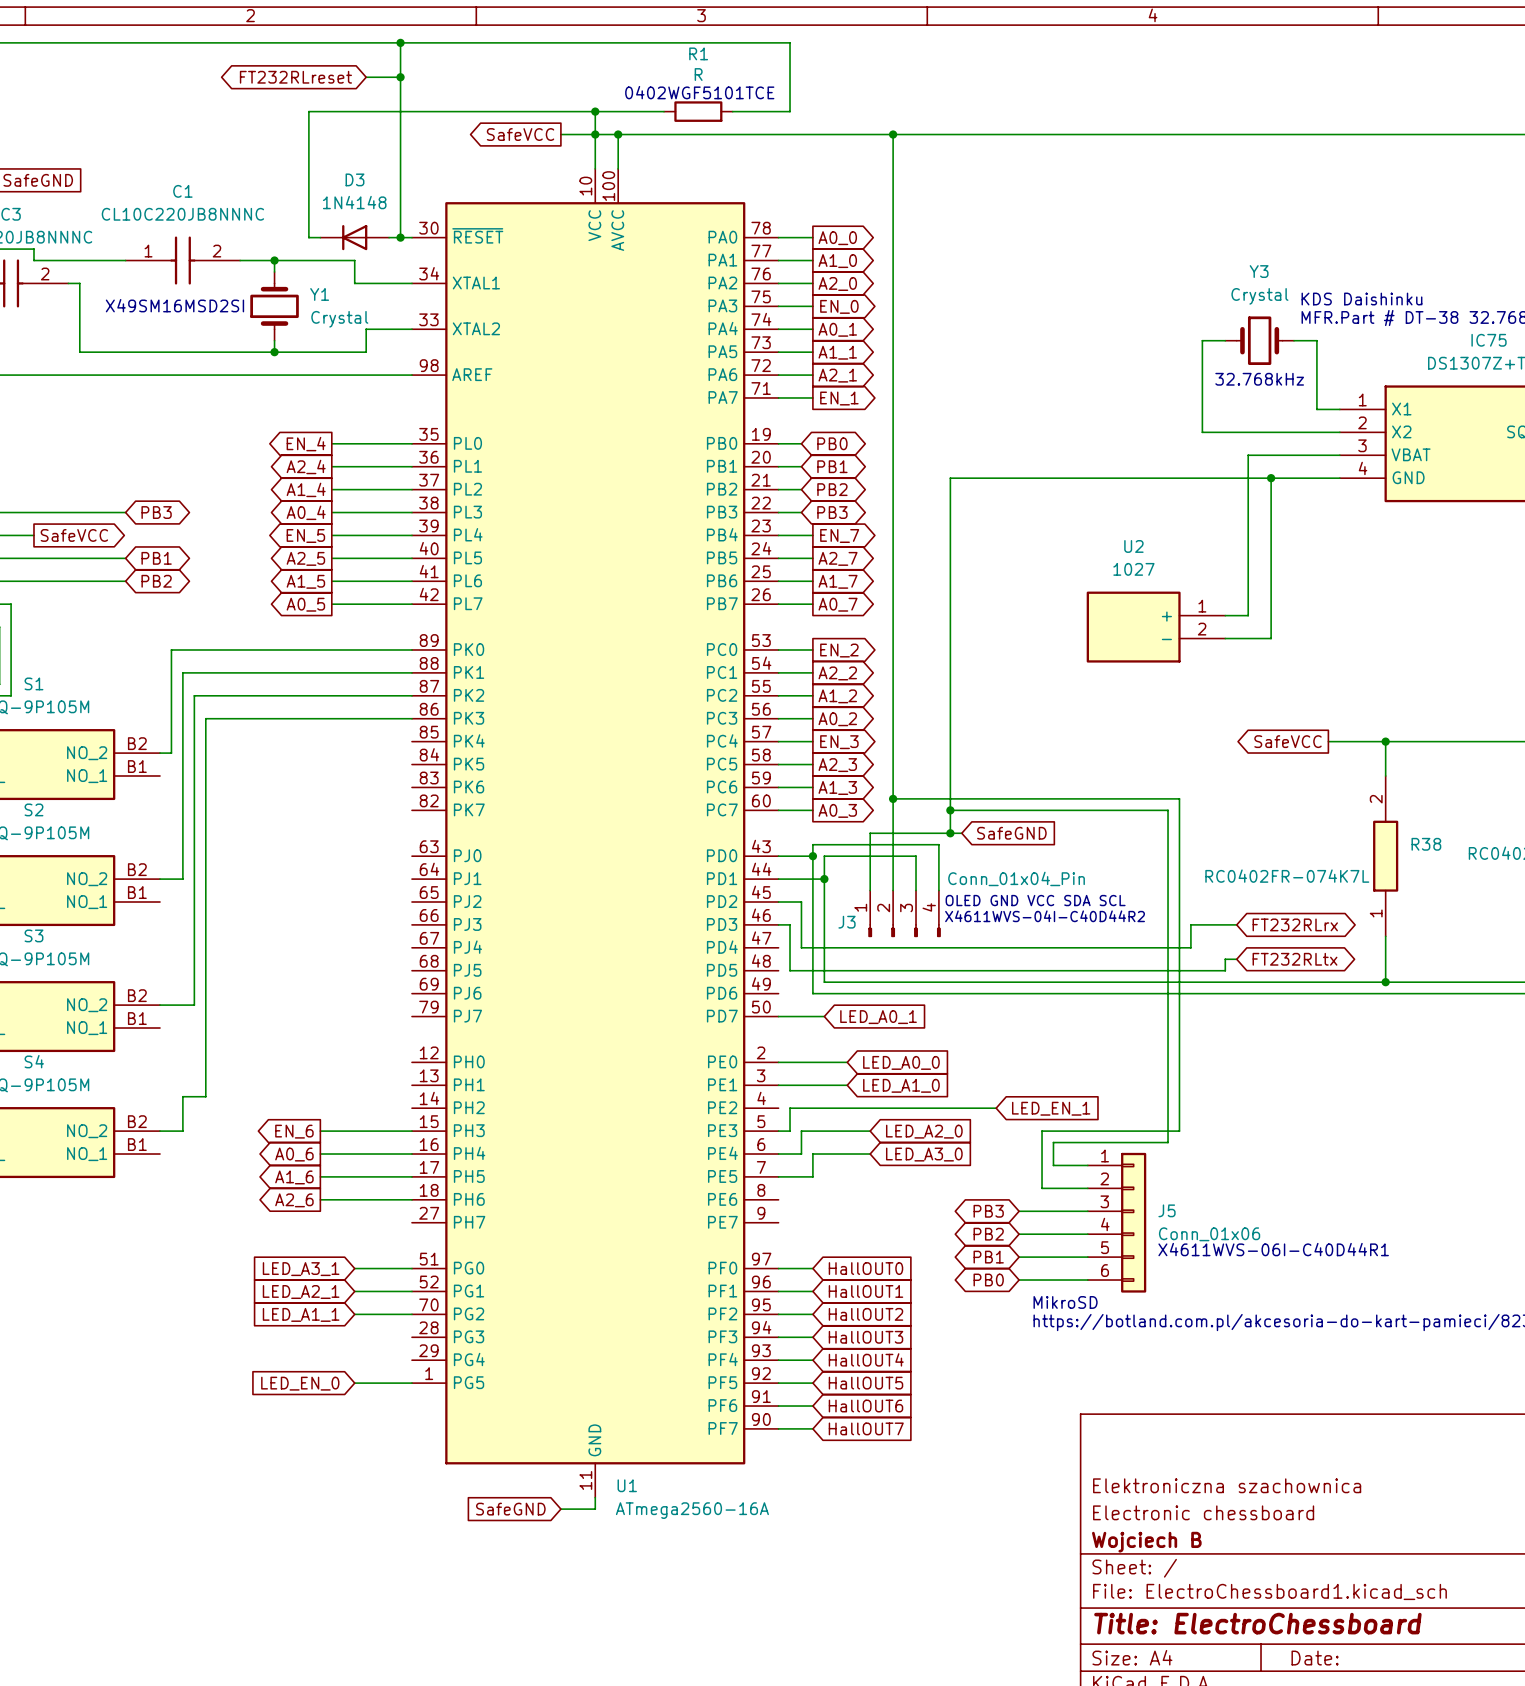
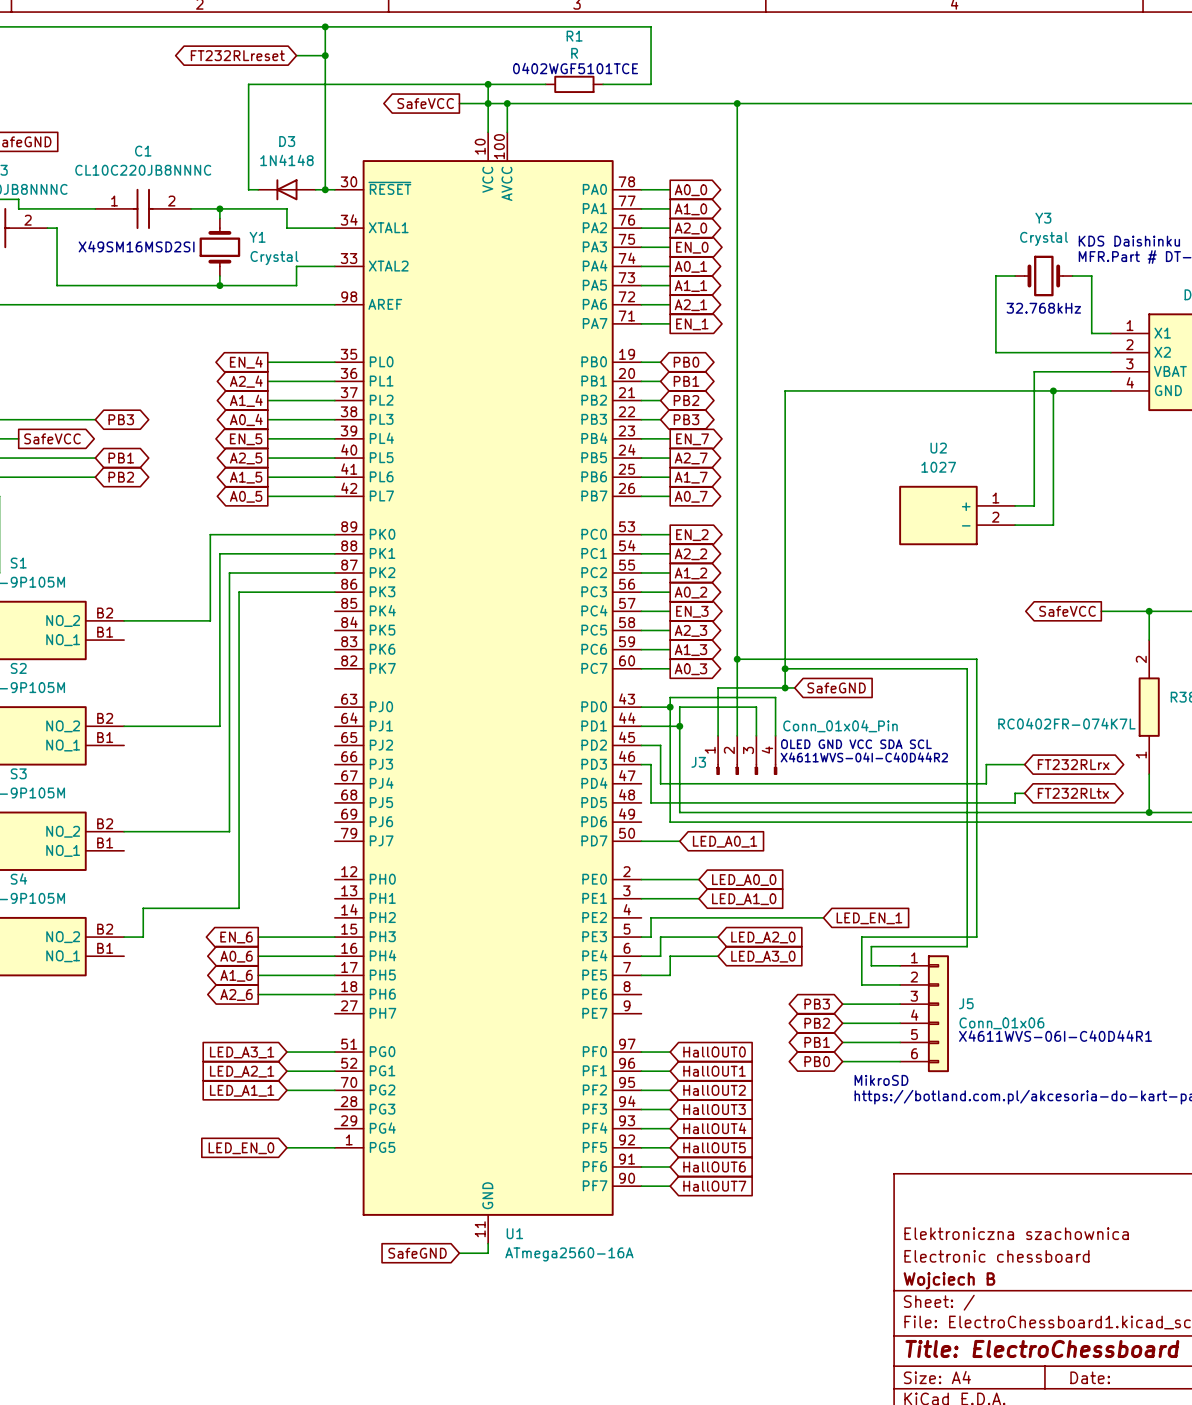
wire: (263, 649) (171, 649) (171, 753) -> (210, 534) (210, 620) (133, 620)
wire: (274, 672) (182, 672) (182, 879) -> (219, 553) (219, 726) (143, 726)
wire: (285, 695) (194, 695) (194, 1005) -> (229, 573) (229, 831) (152, 831)
wire: (297, 718) (205, 718) (205, 1096) -> (239, 592) (239, 908) (162, 908)

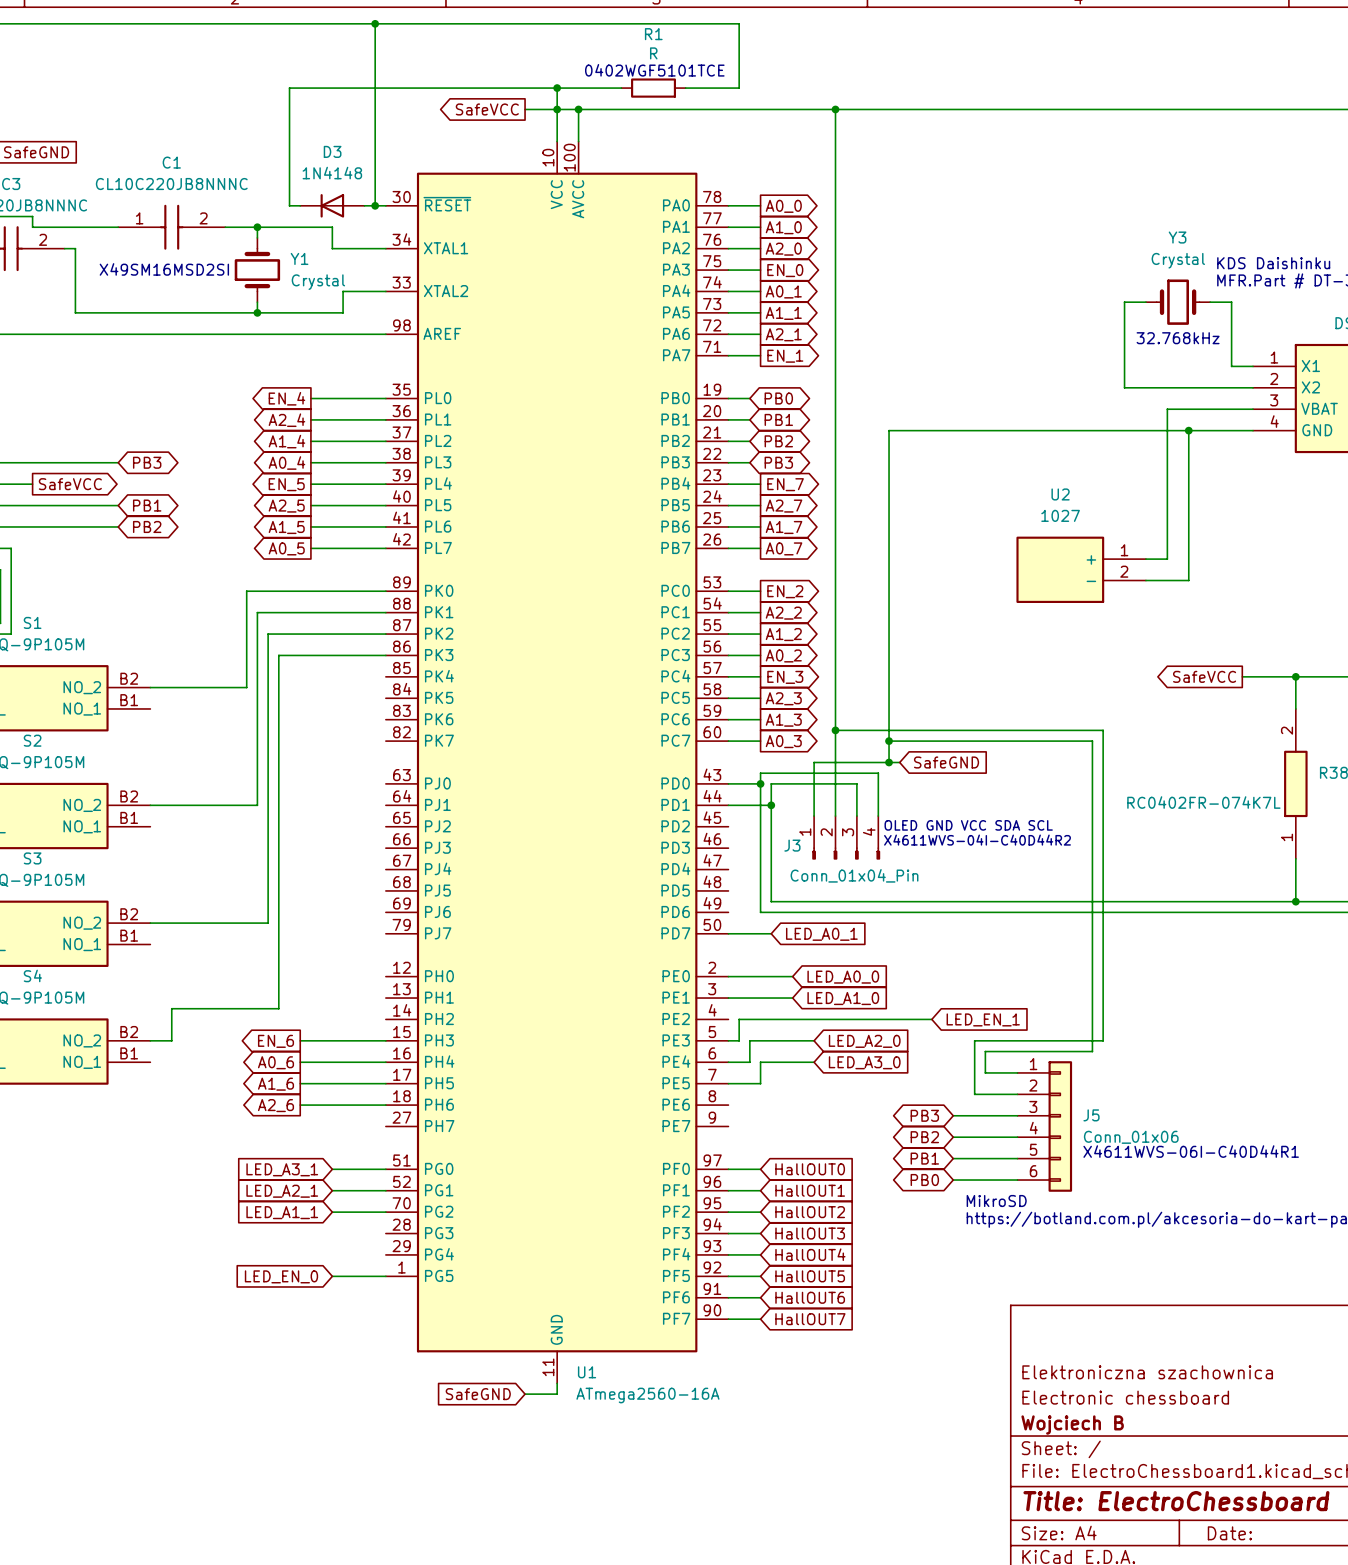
global label: FT232RLreset (237, 55) -> none
wire: (296, 55) (325, 55) -> none
junction: (325, 55) -> none
J3 value position: Conn_01x04_Pin (840, 726) -> Conn_01x04_Pin (854, 875)
wire: (641, 745) (660, 745) (660, 783) (986, 783) (986, 764) (1024, 764) -> none
wire: (641, 764) (651, 764) (651, 802) (1015, 802) (1015, 793) (1024, 793) -> none
global label: FT232RLrx (1073, 764) -> none
global label: FT232RLtx (1073, 793) -> none

